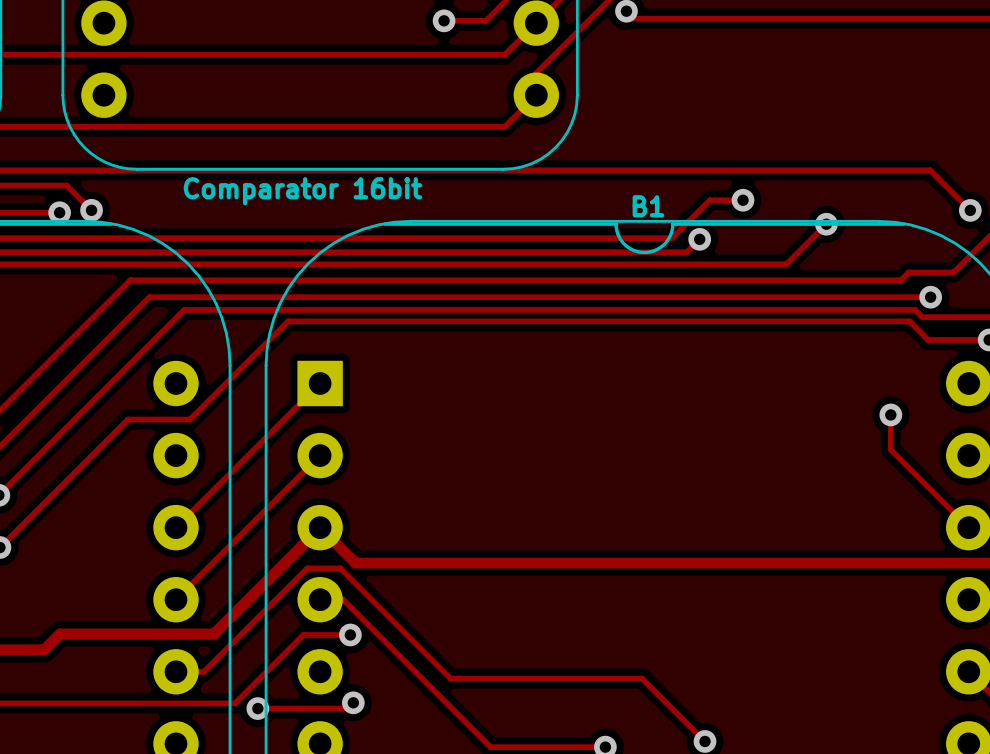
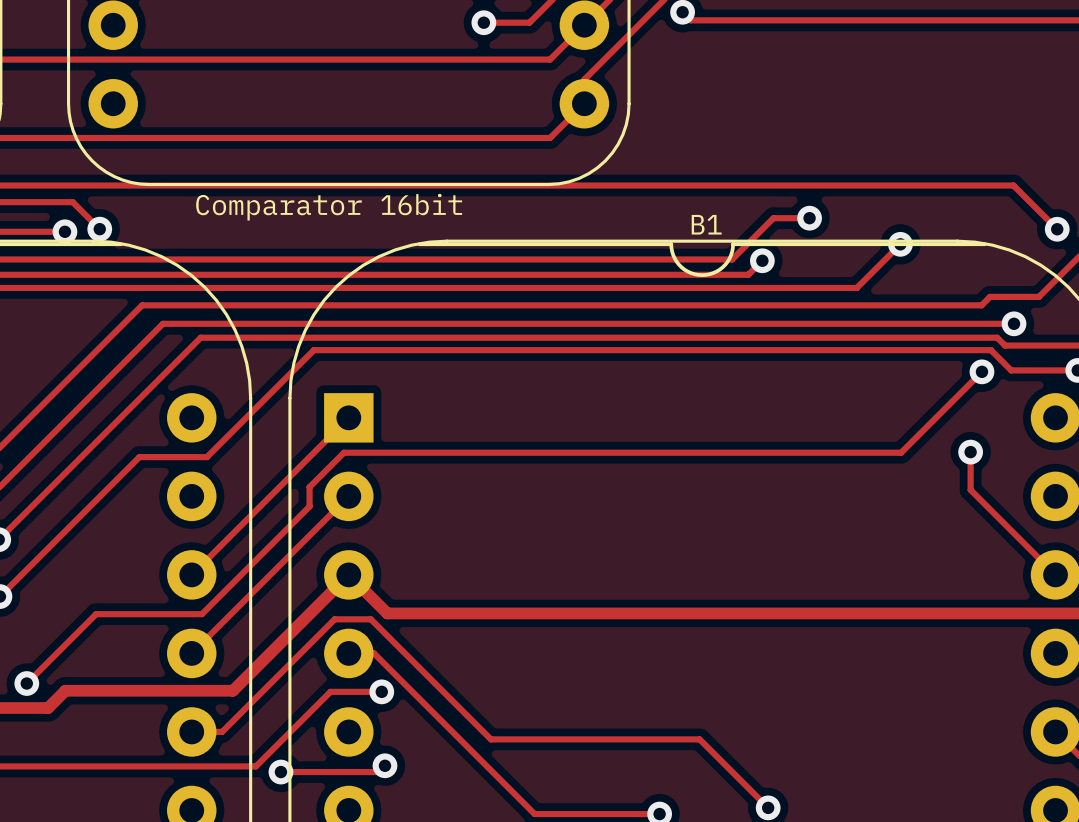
track: none -> (981, 371) (901, 452) (343, 452) (309, 487) (309, 506) (201, 614) (96, 614) (26, 683)
via: none -> (981, 371)
via: none -> (26, 683)

